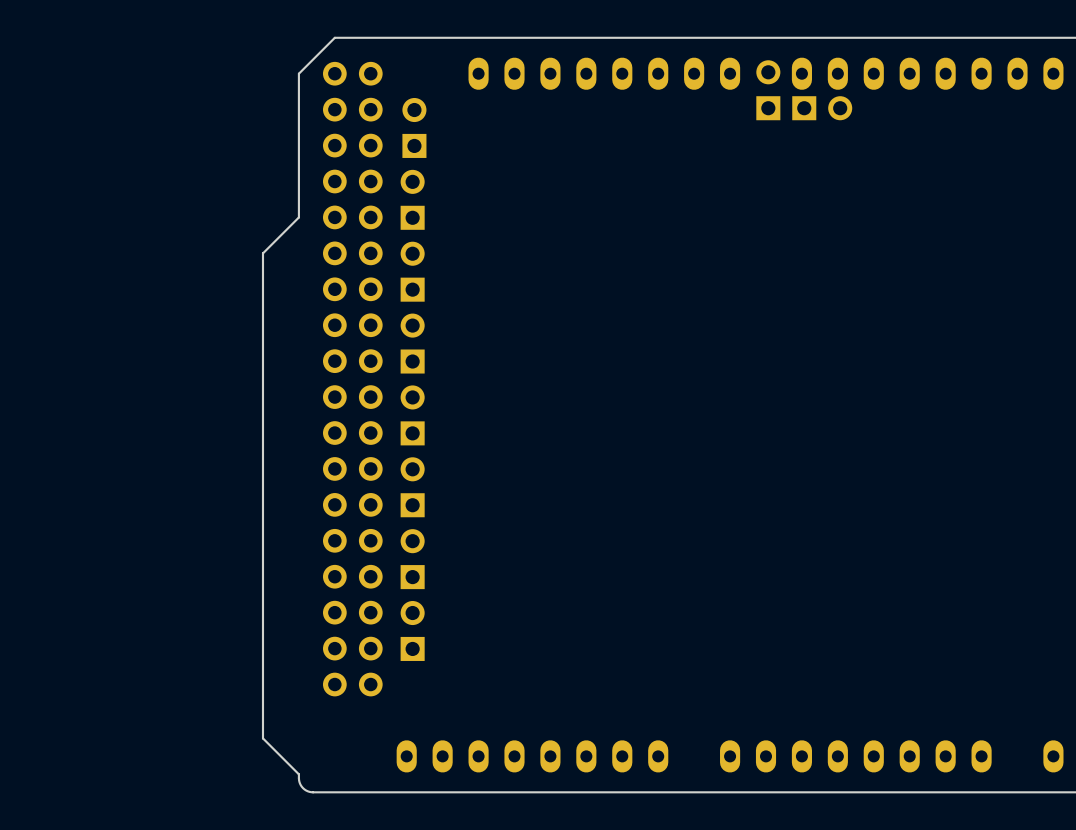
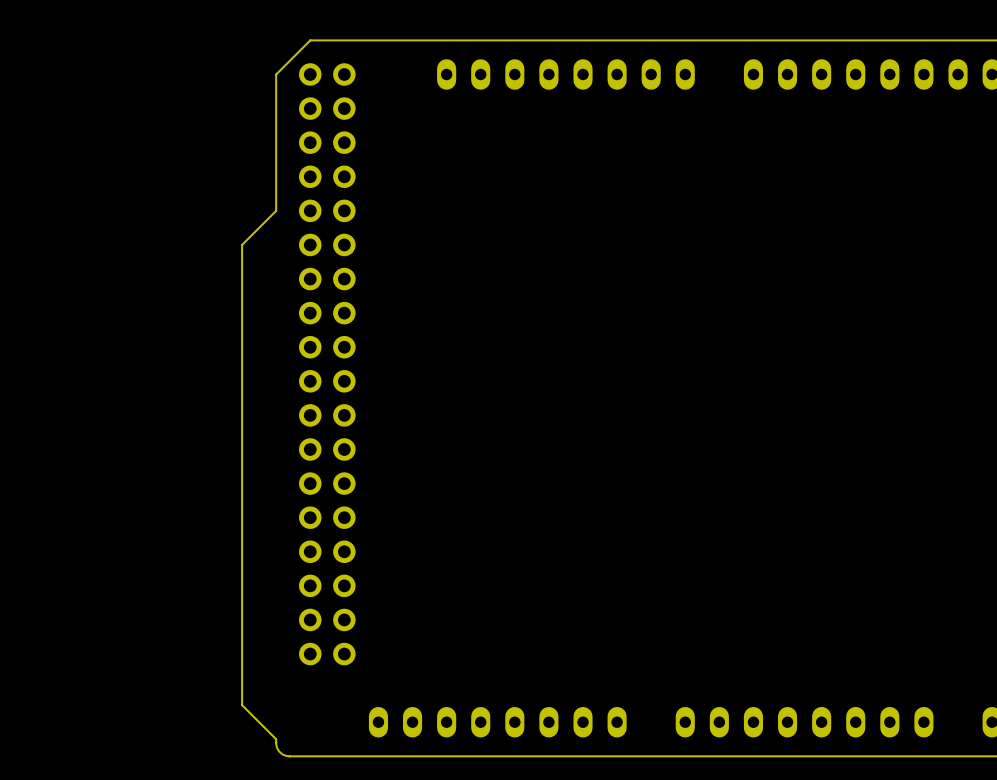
part: (768, 90) -> none
part: (822, 108) -> none
part: (414, 127) -> none
part: (412, 199) -> none
part: (412, 271) -> none
part: (412, 343) -> none
part: (412, 415) -> none
part: (412, 487) -> none
part: (412, 559) -> none
part: (412, 630) -> none

